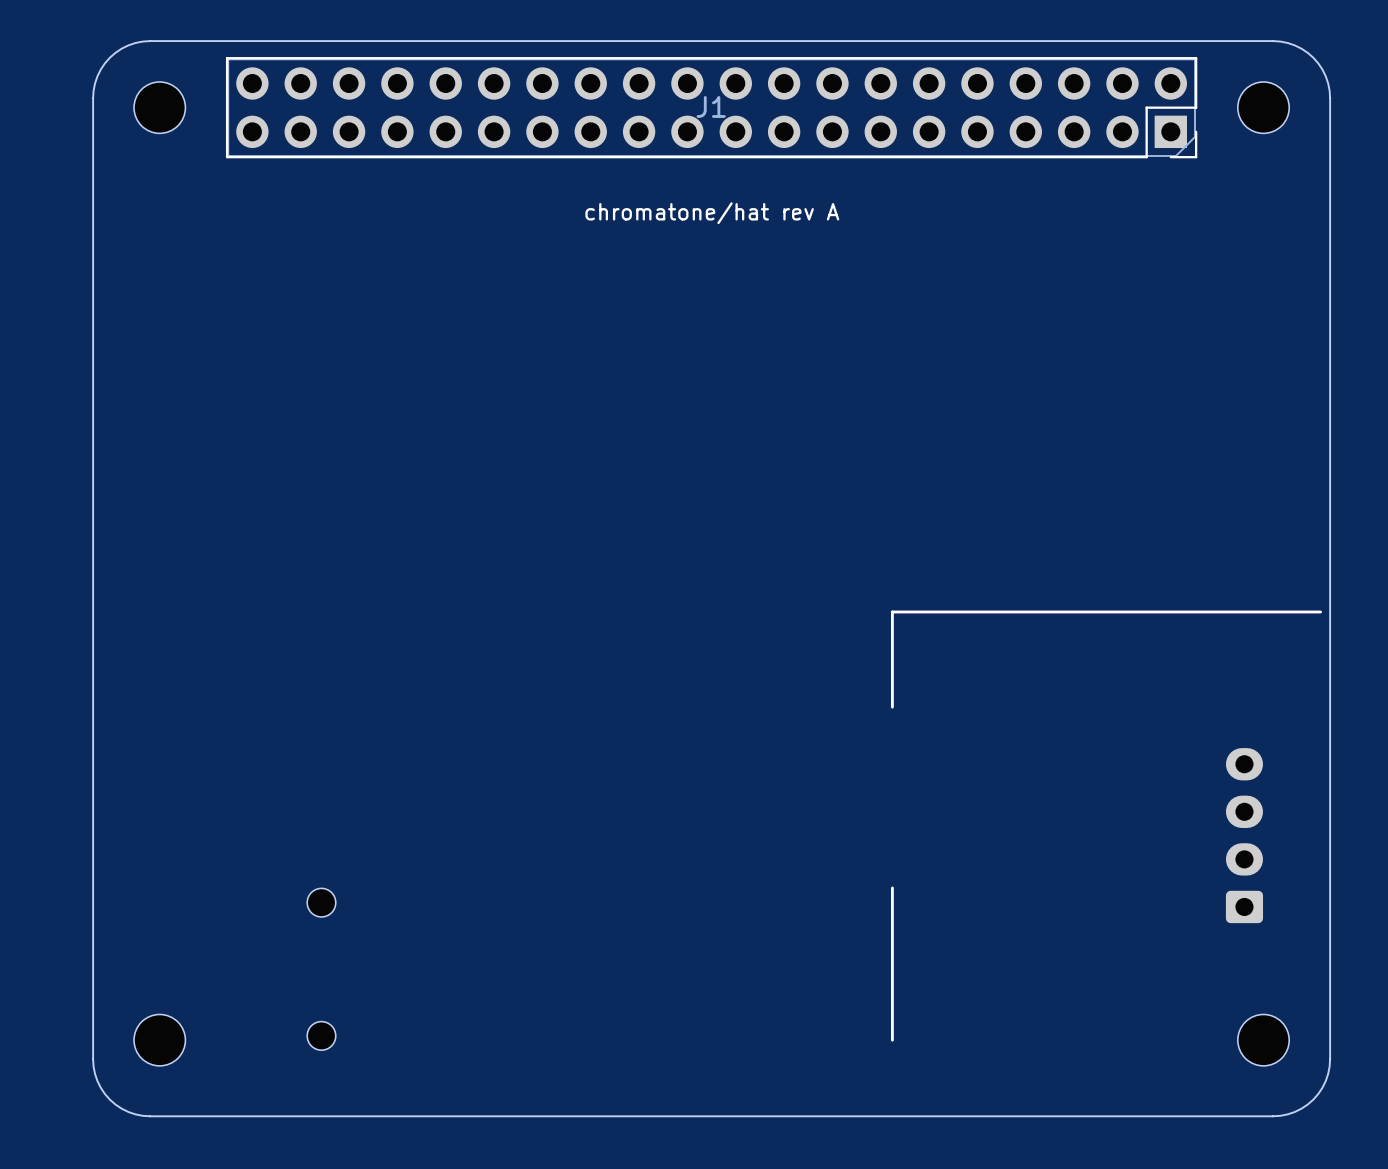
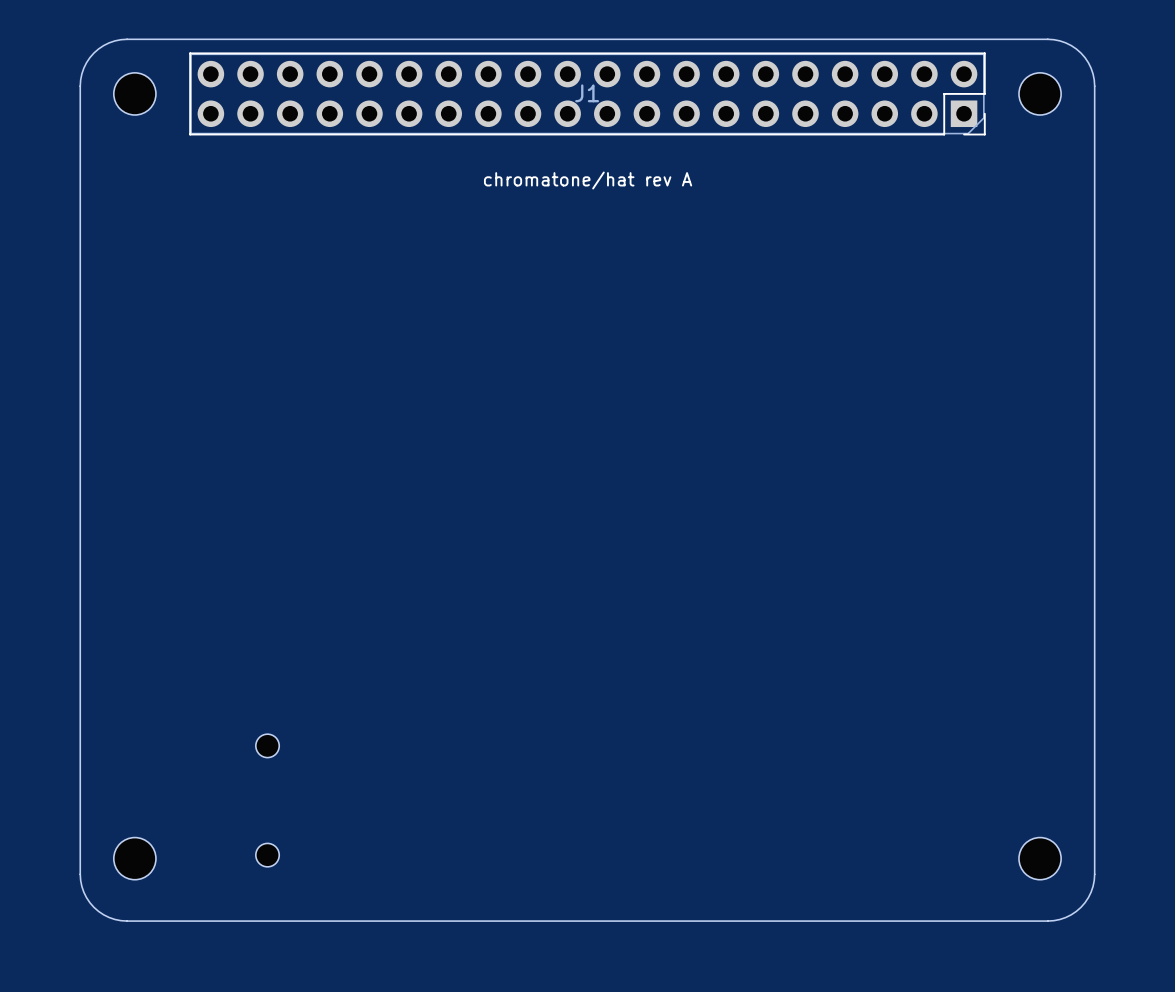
line: (1320, 611) (892, 611) (892, 707) -> none
part: (1244, 835) -> none
line: (892, 887) (892, 1040) -> none

